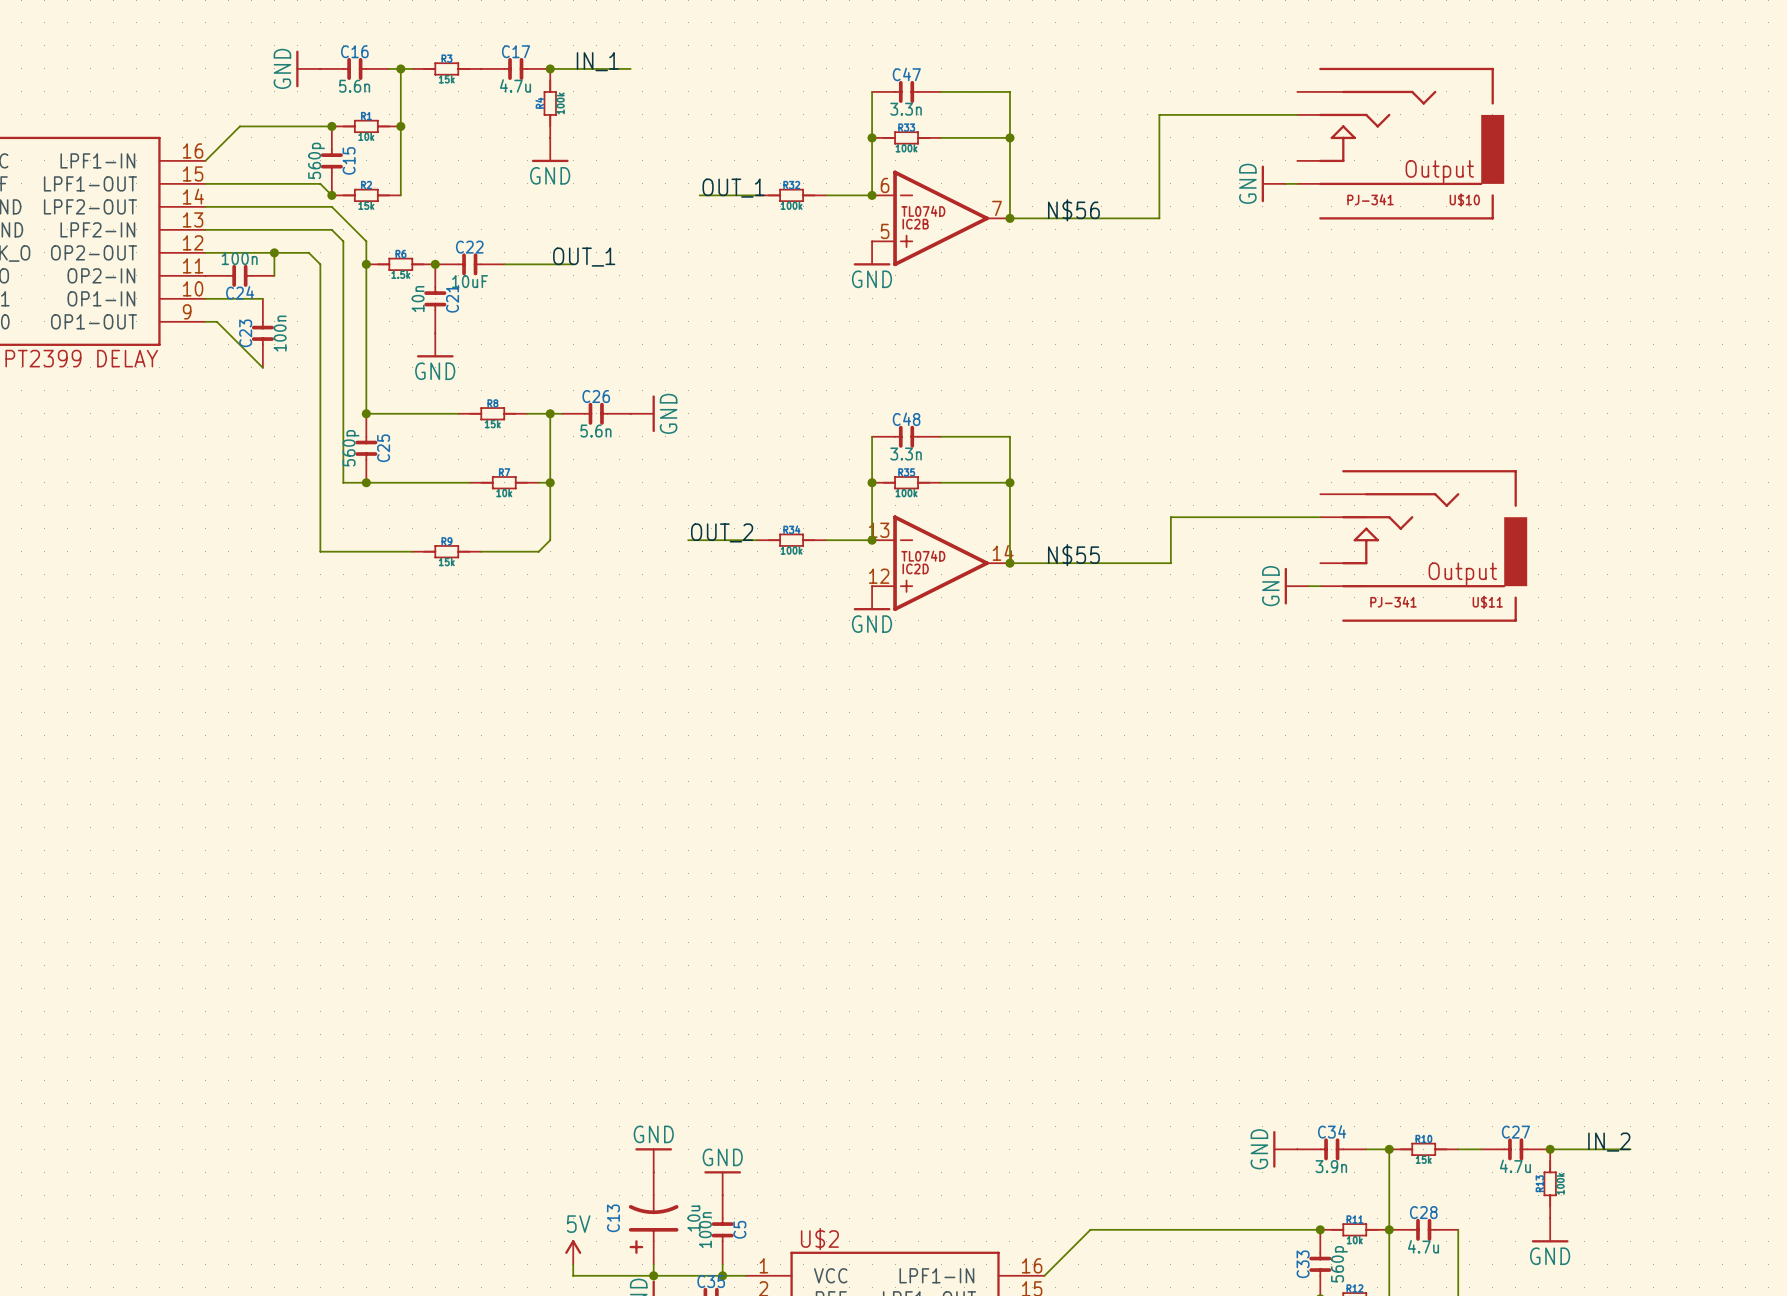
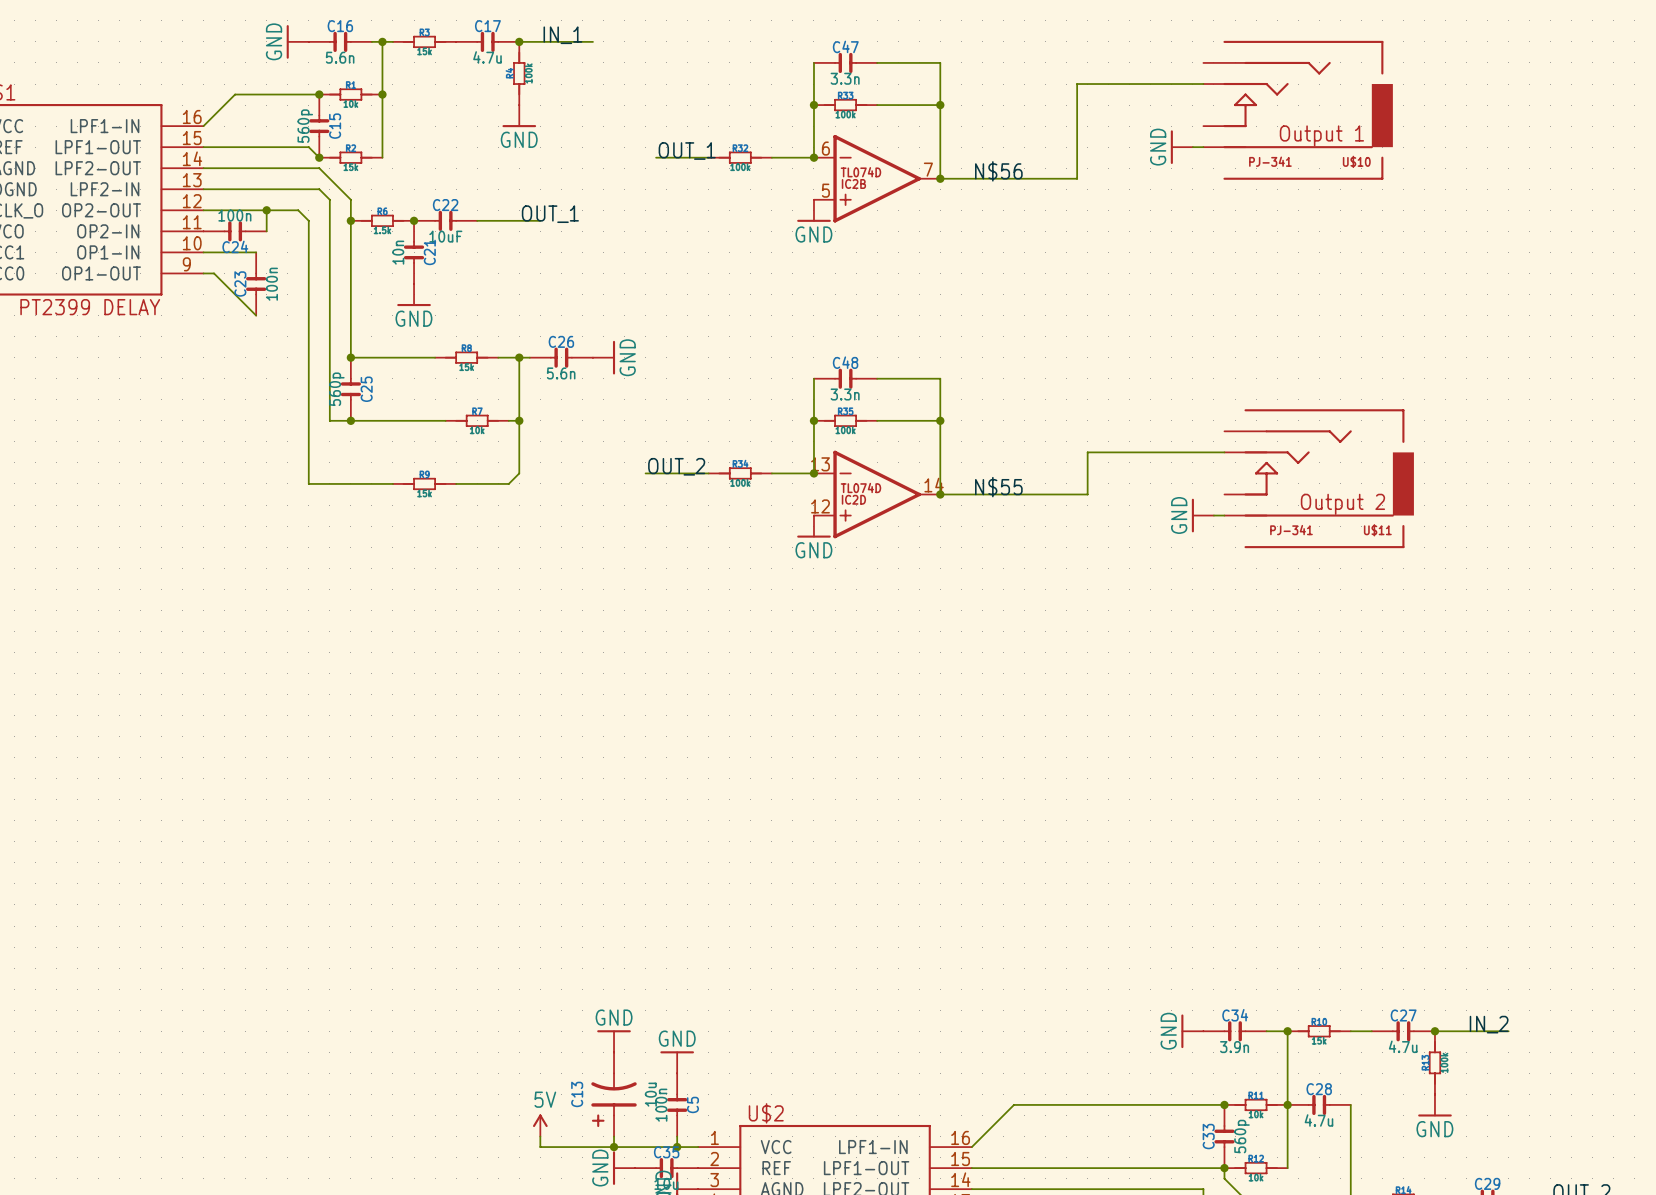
U$10 text: Output (1439, 171) -> Output 1 (1321, 135)
U$11 text: Output (1462, 573) -> Output 2 (1342, 504)

